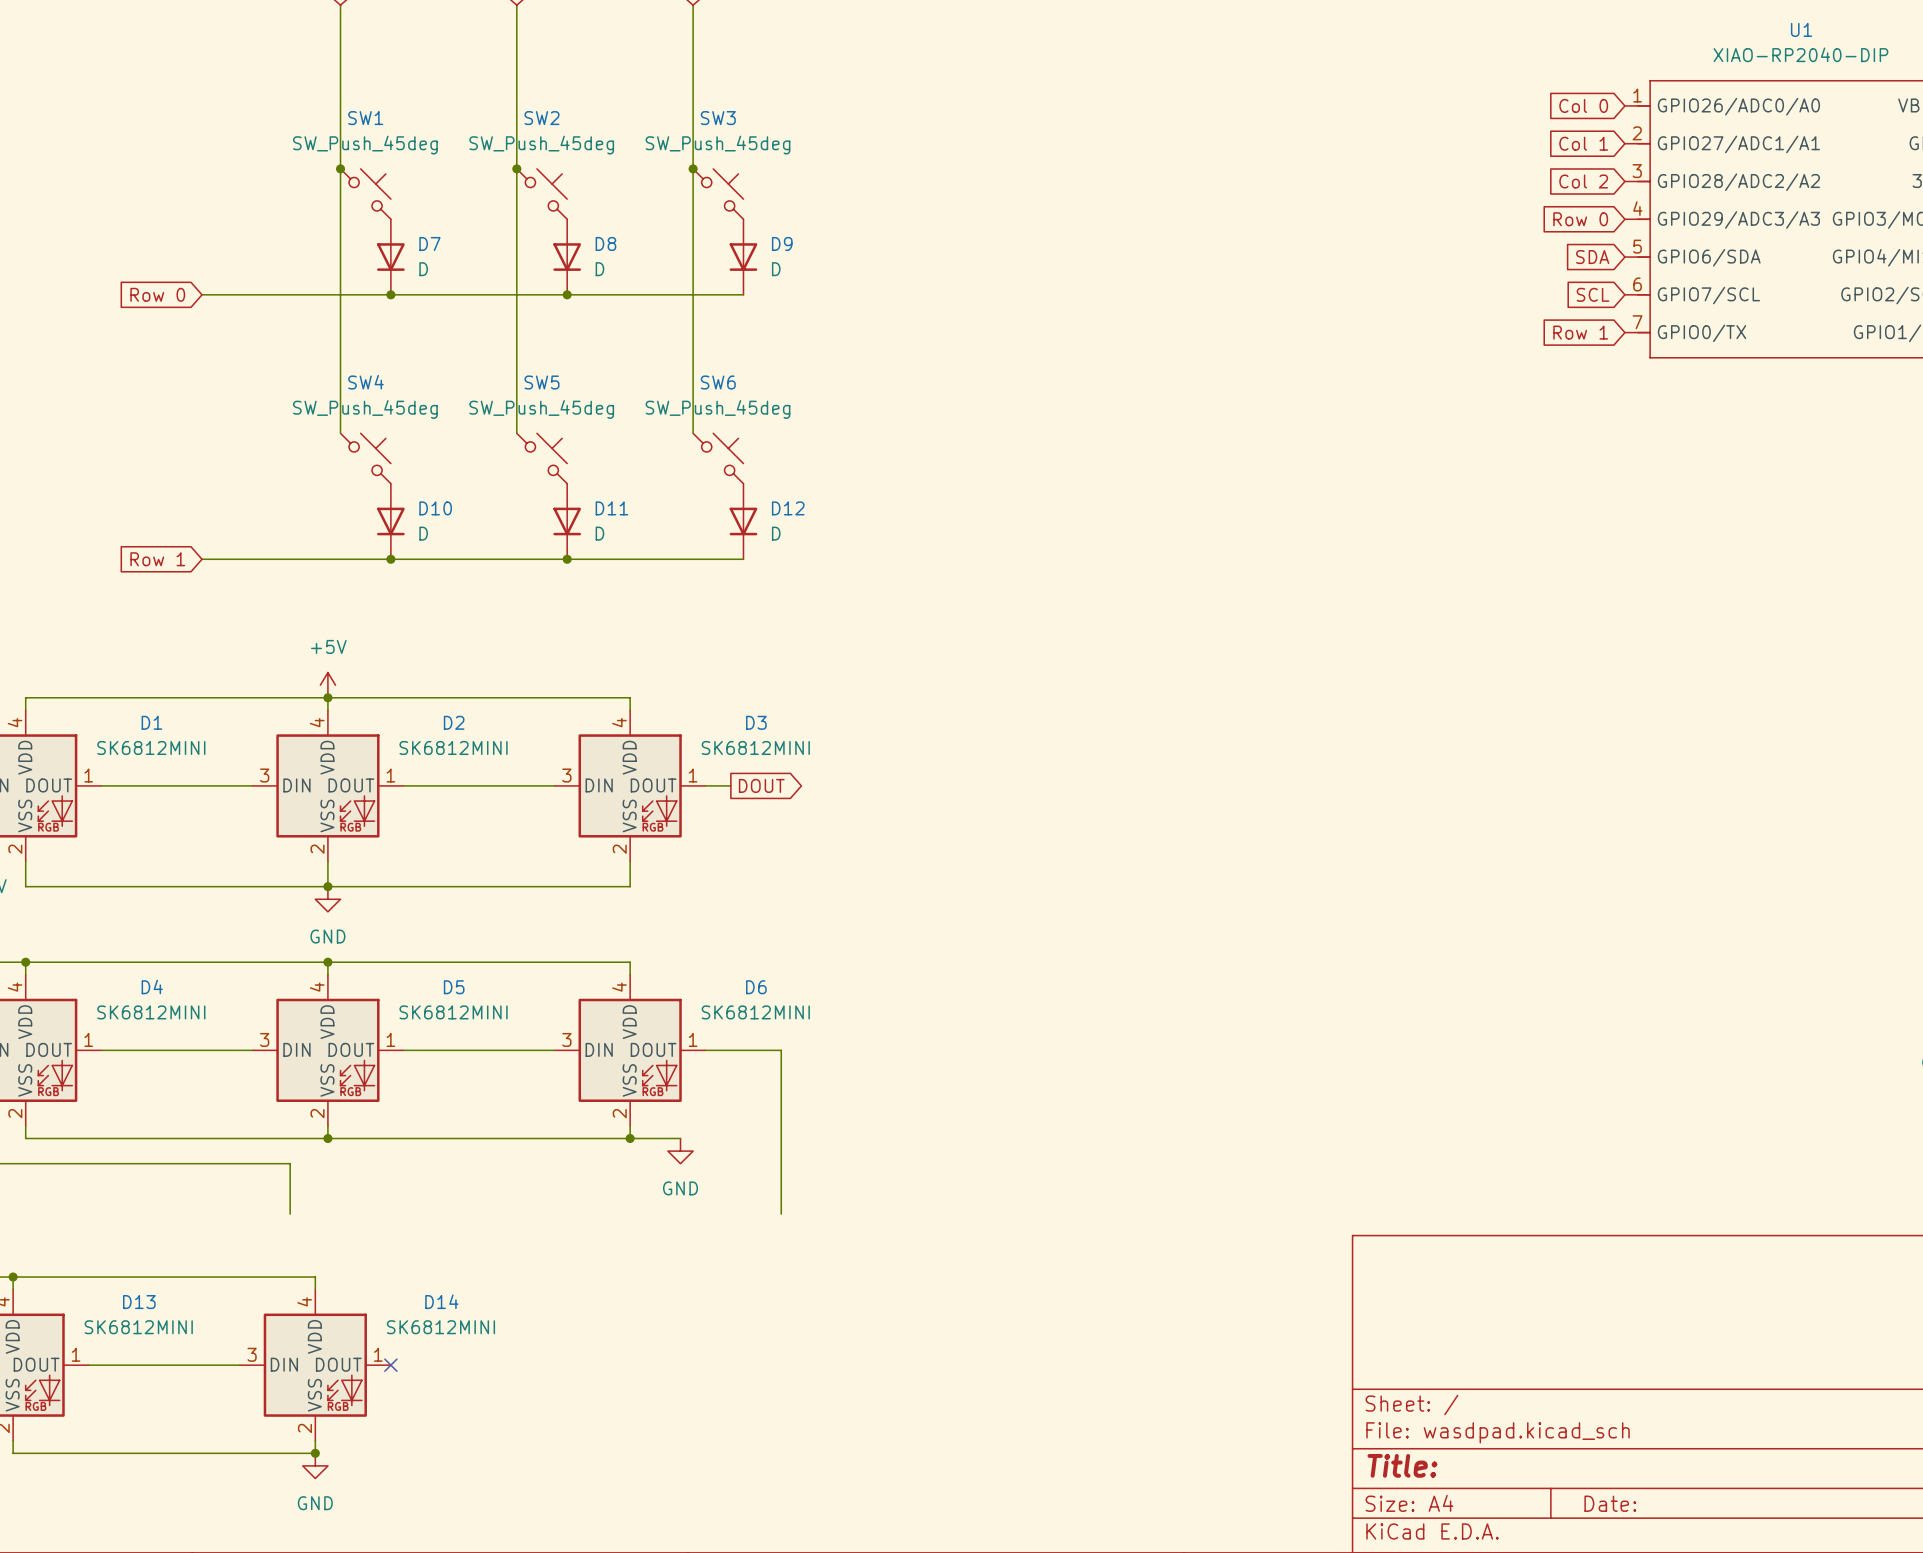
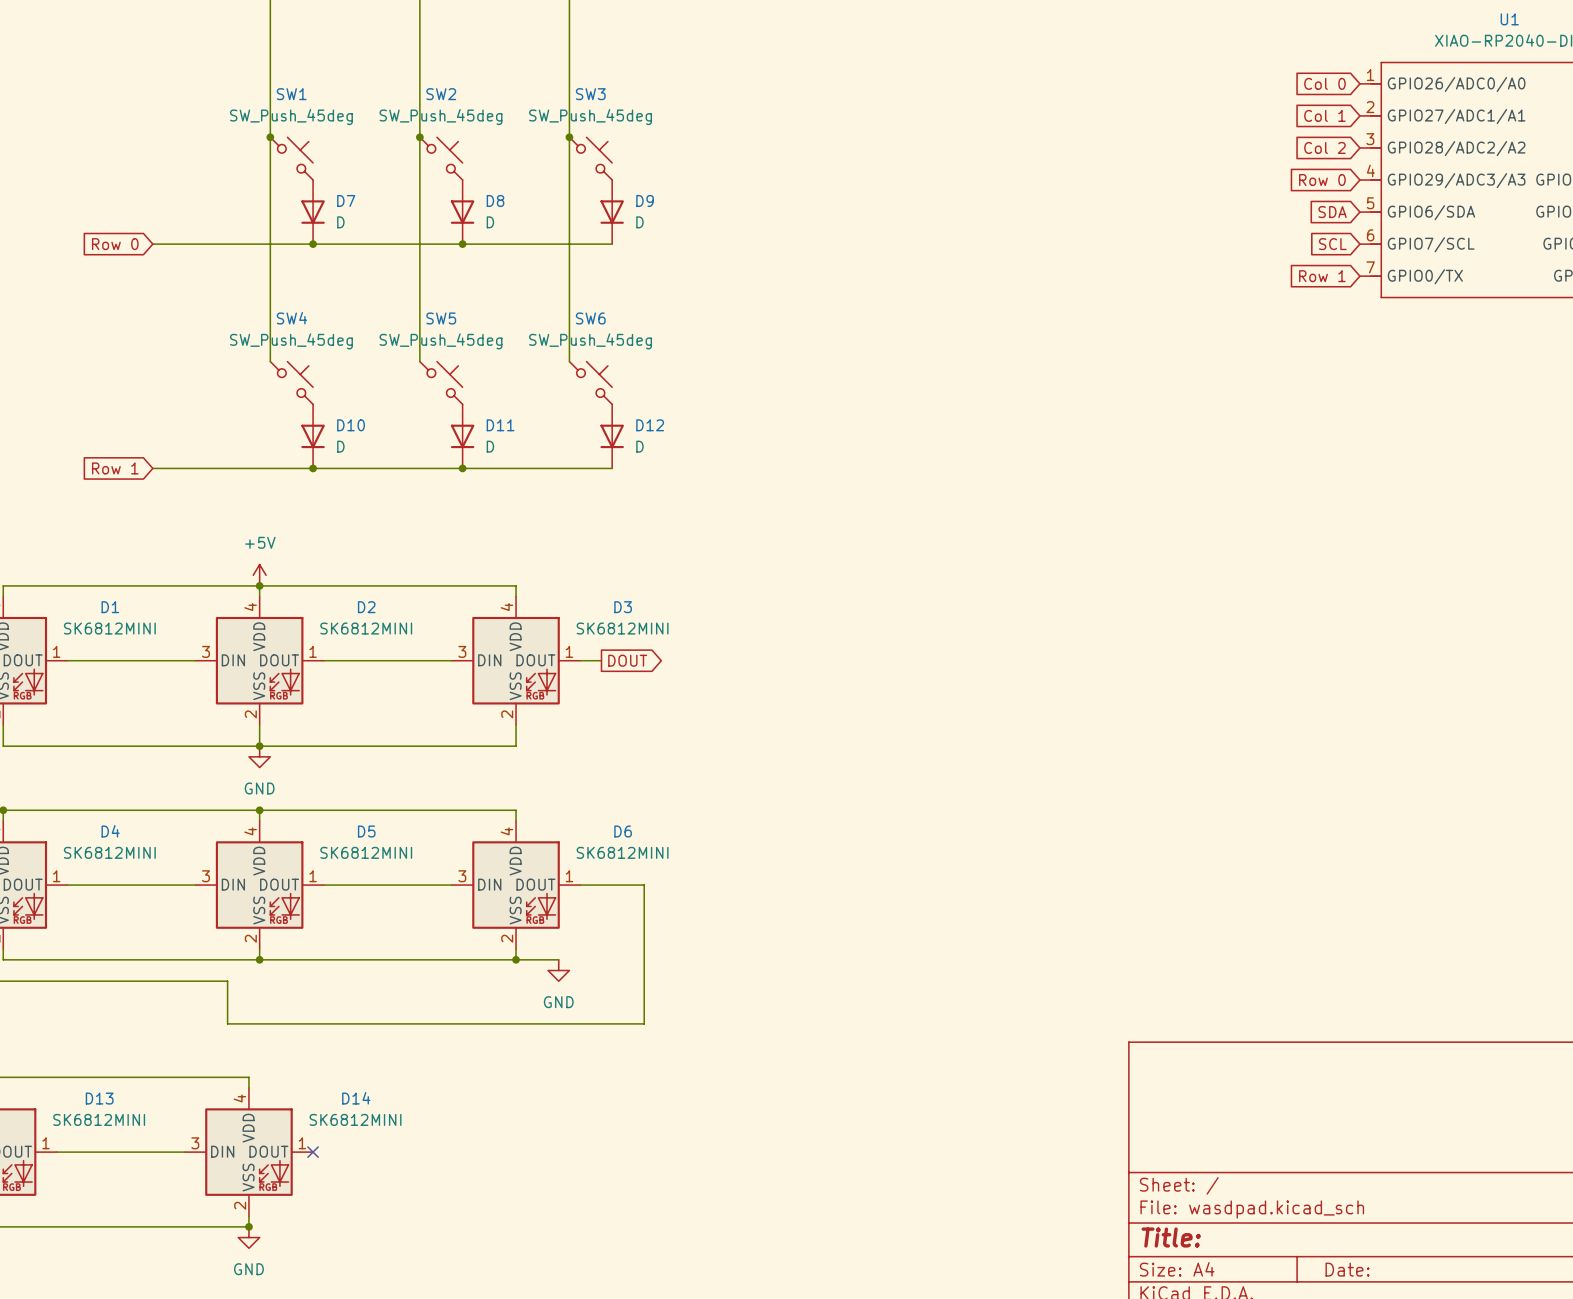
wire: none -> (227, 1023) (644, 1023)

